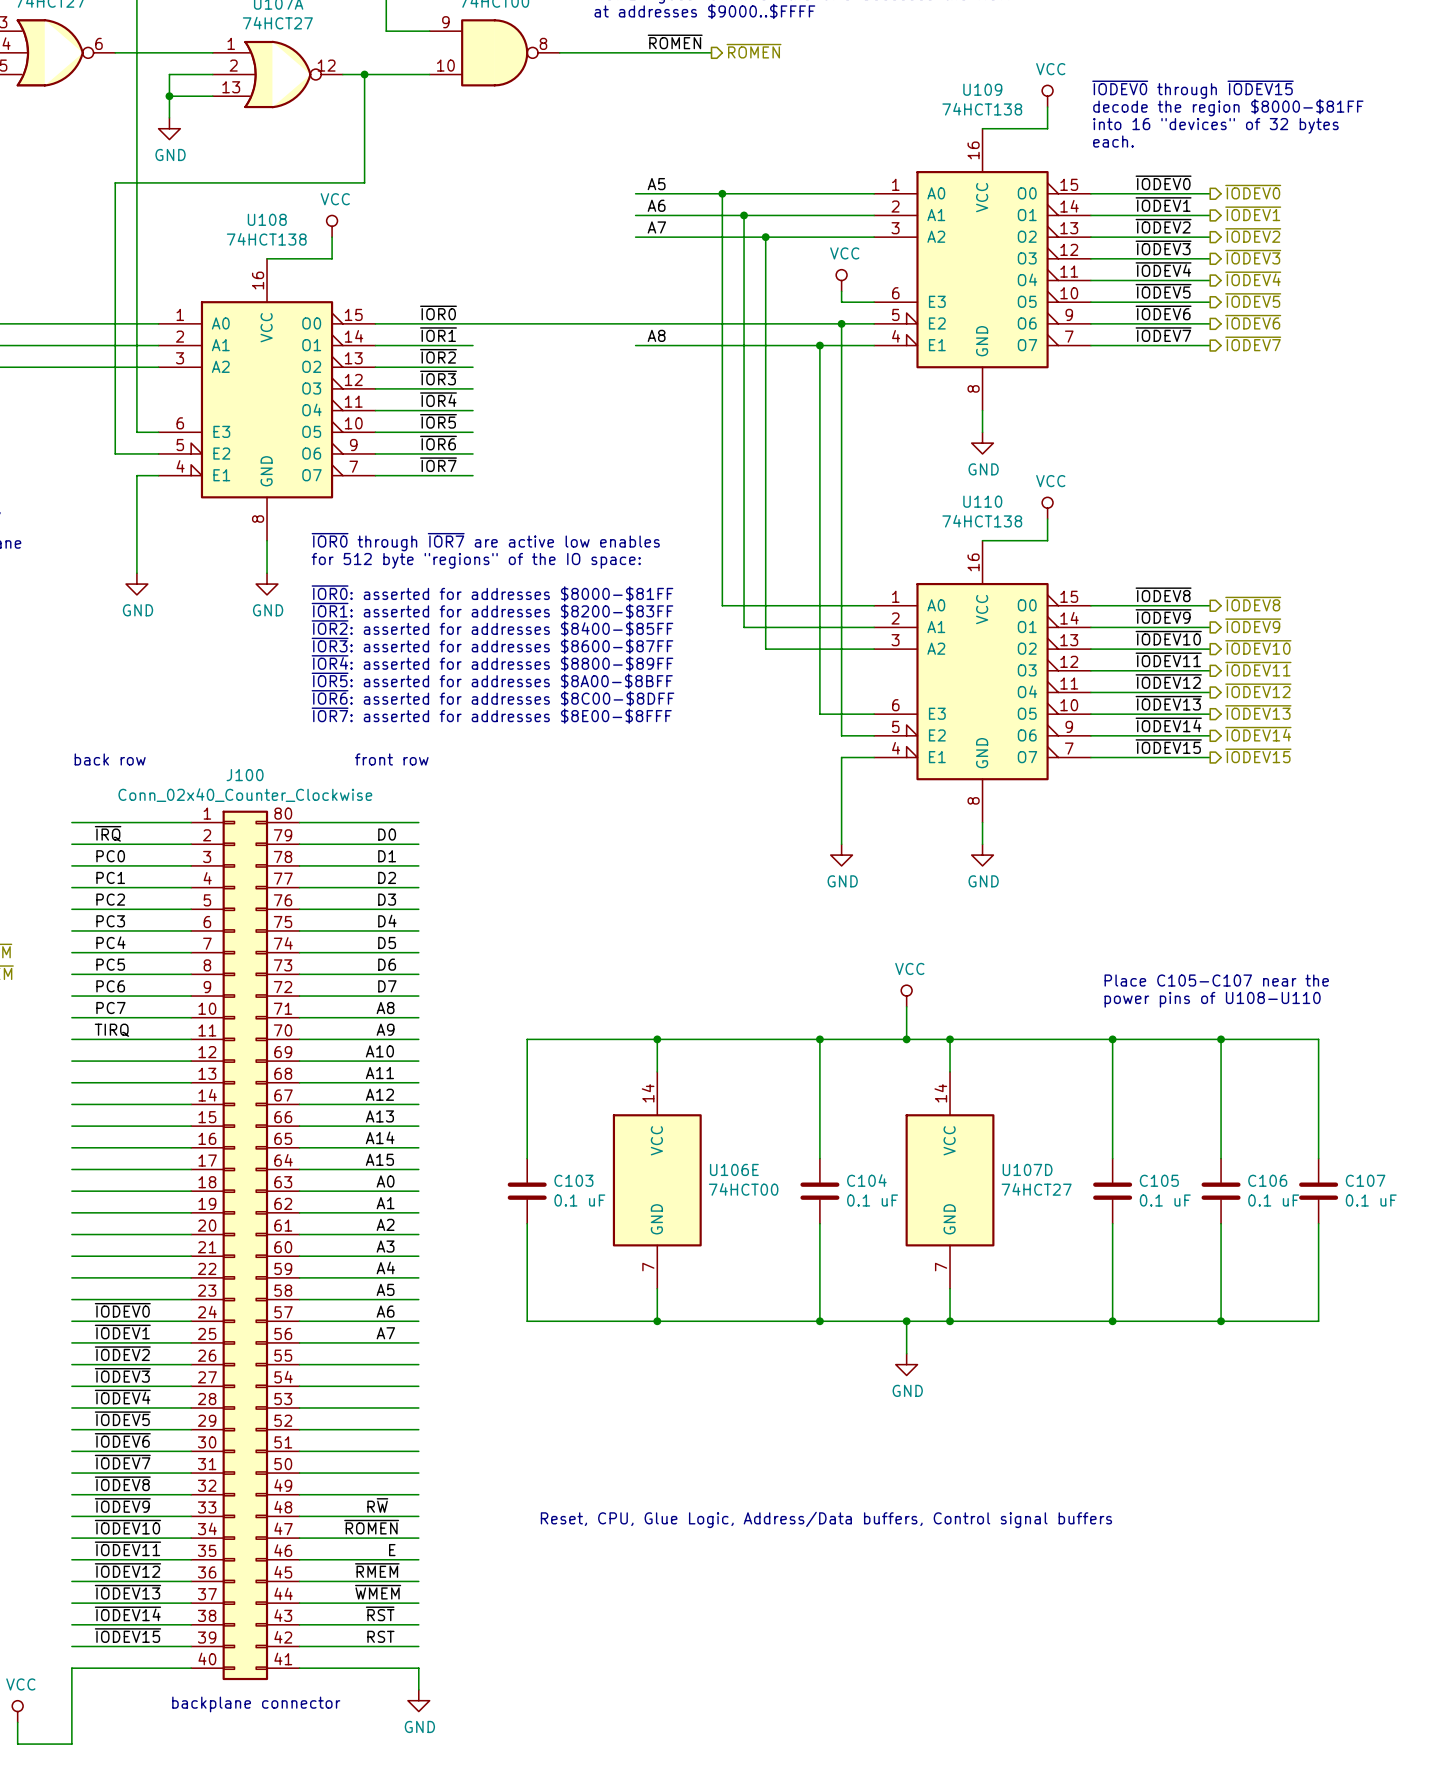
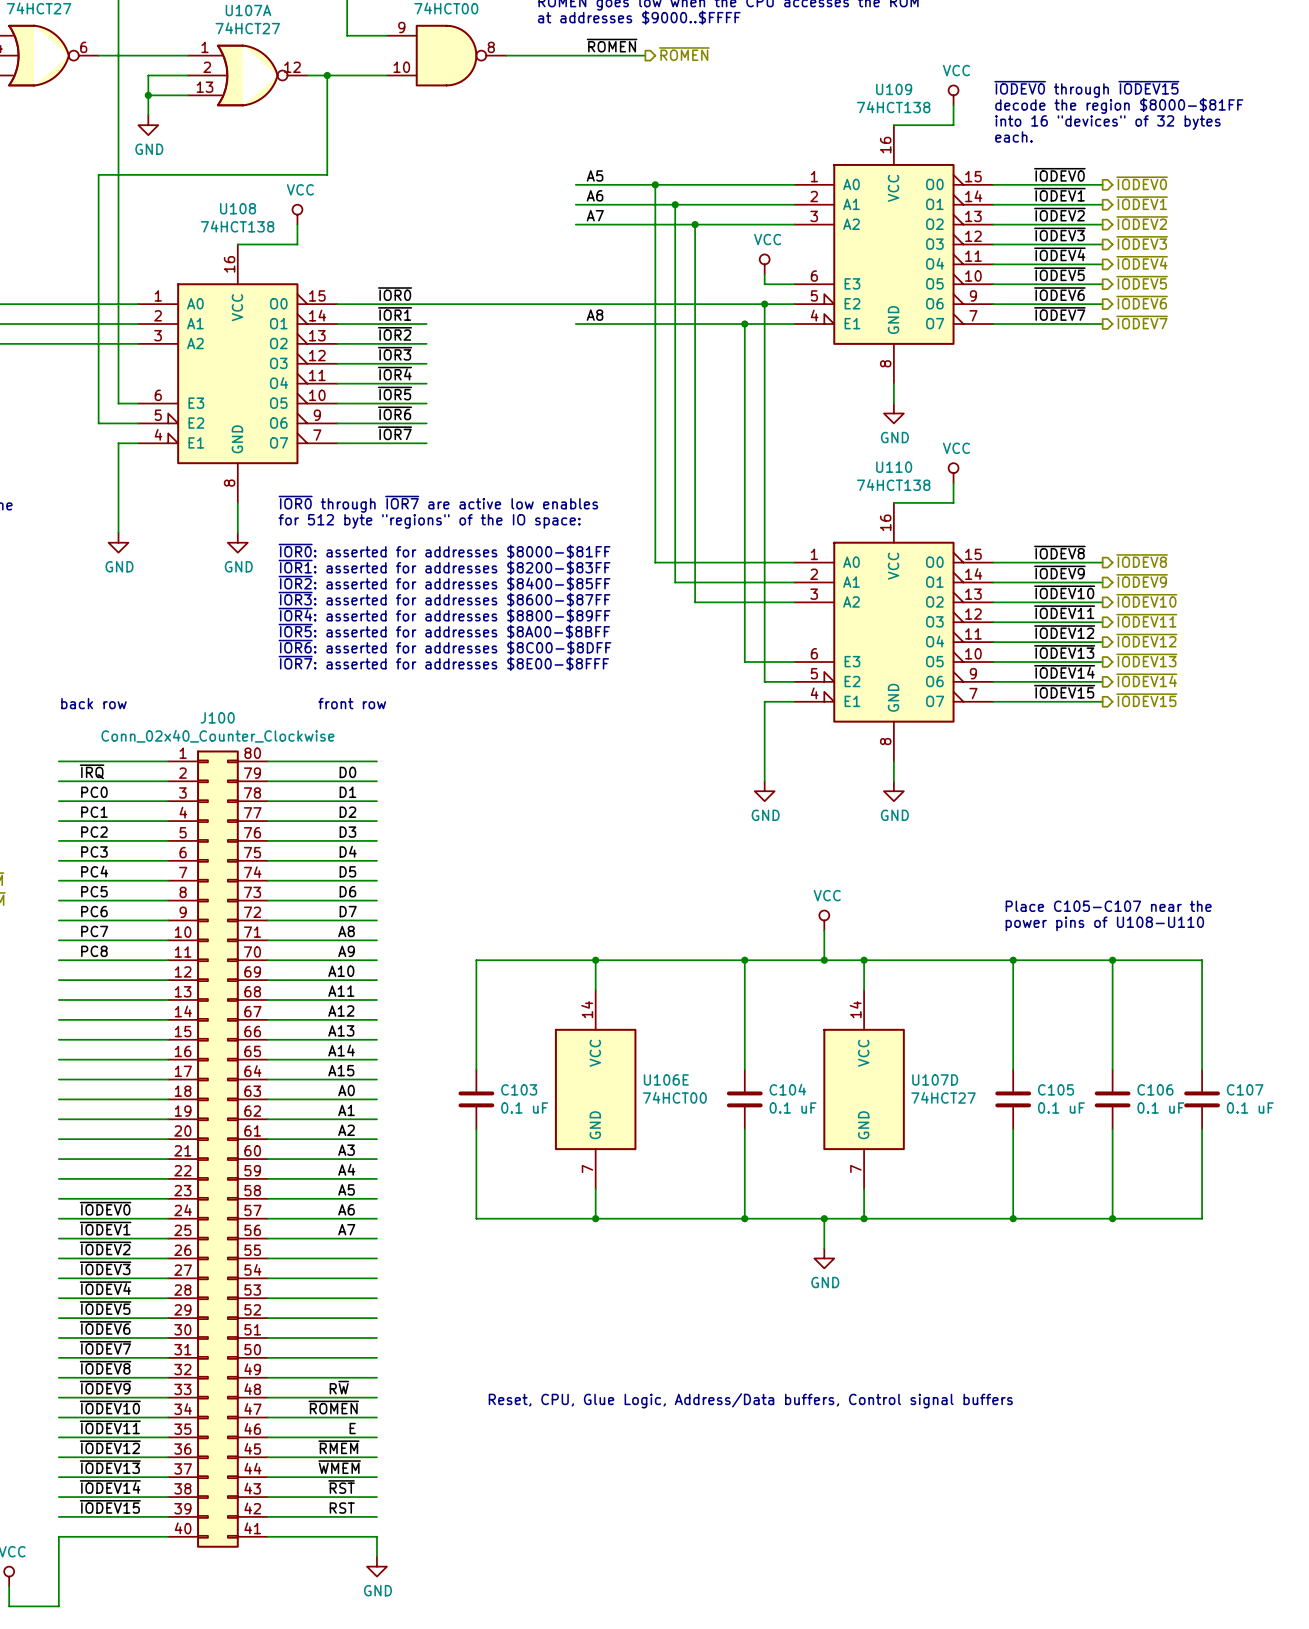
label: TIRQ (111, 1030) -> PC8 (94, 951)
text: backplane connector (256, 1704) -> none

